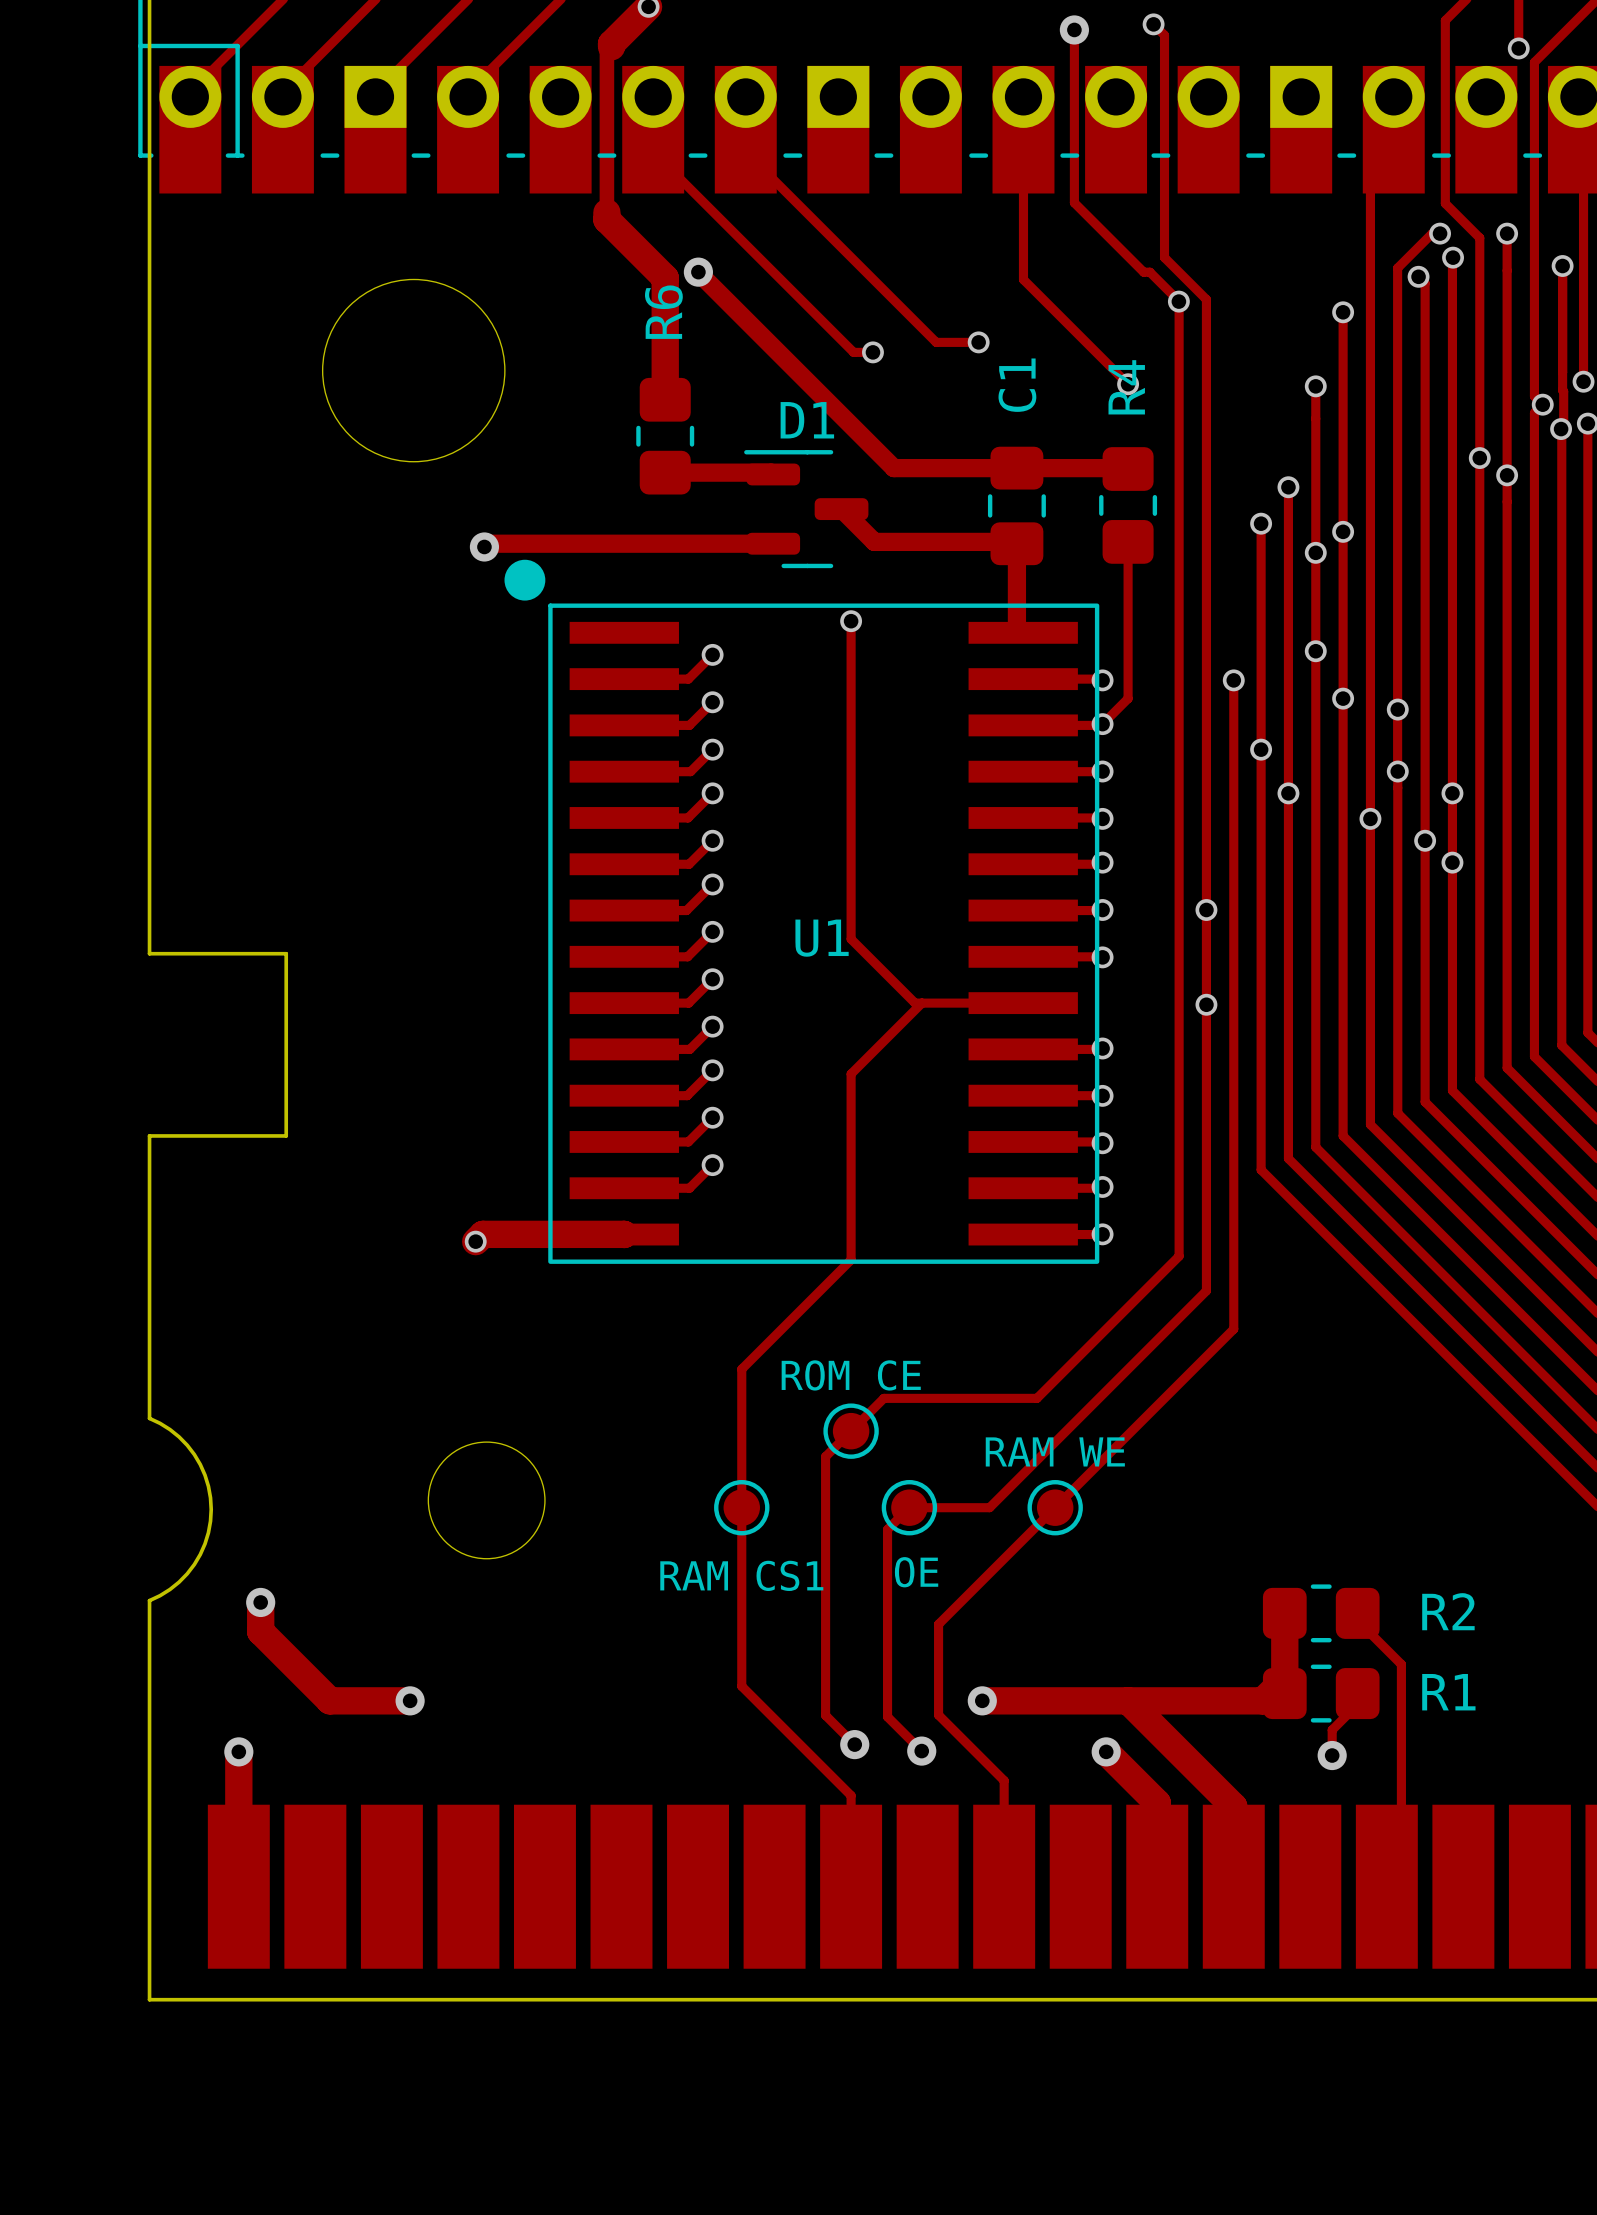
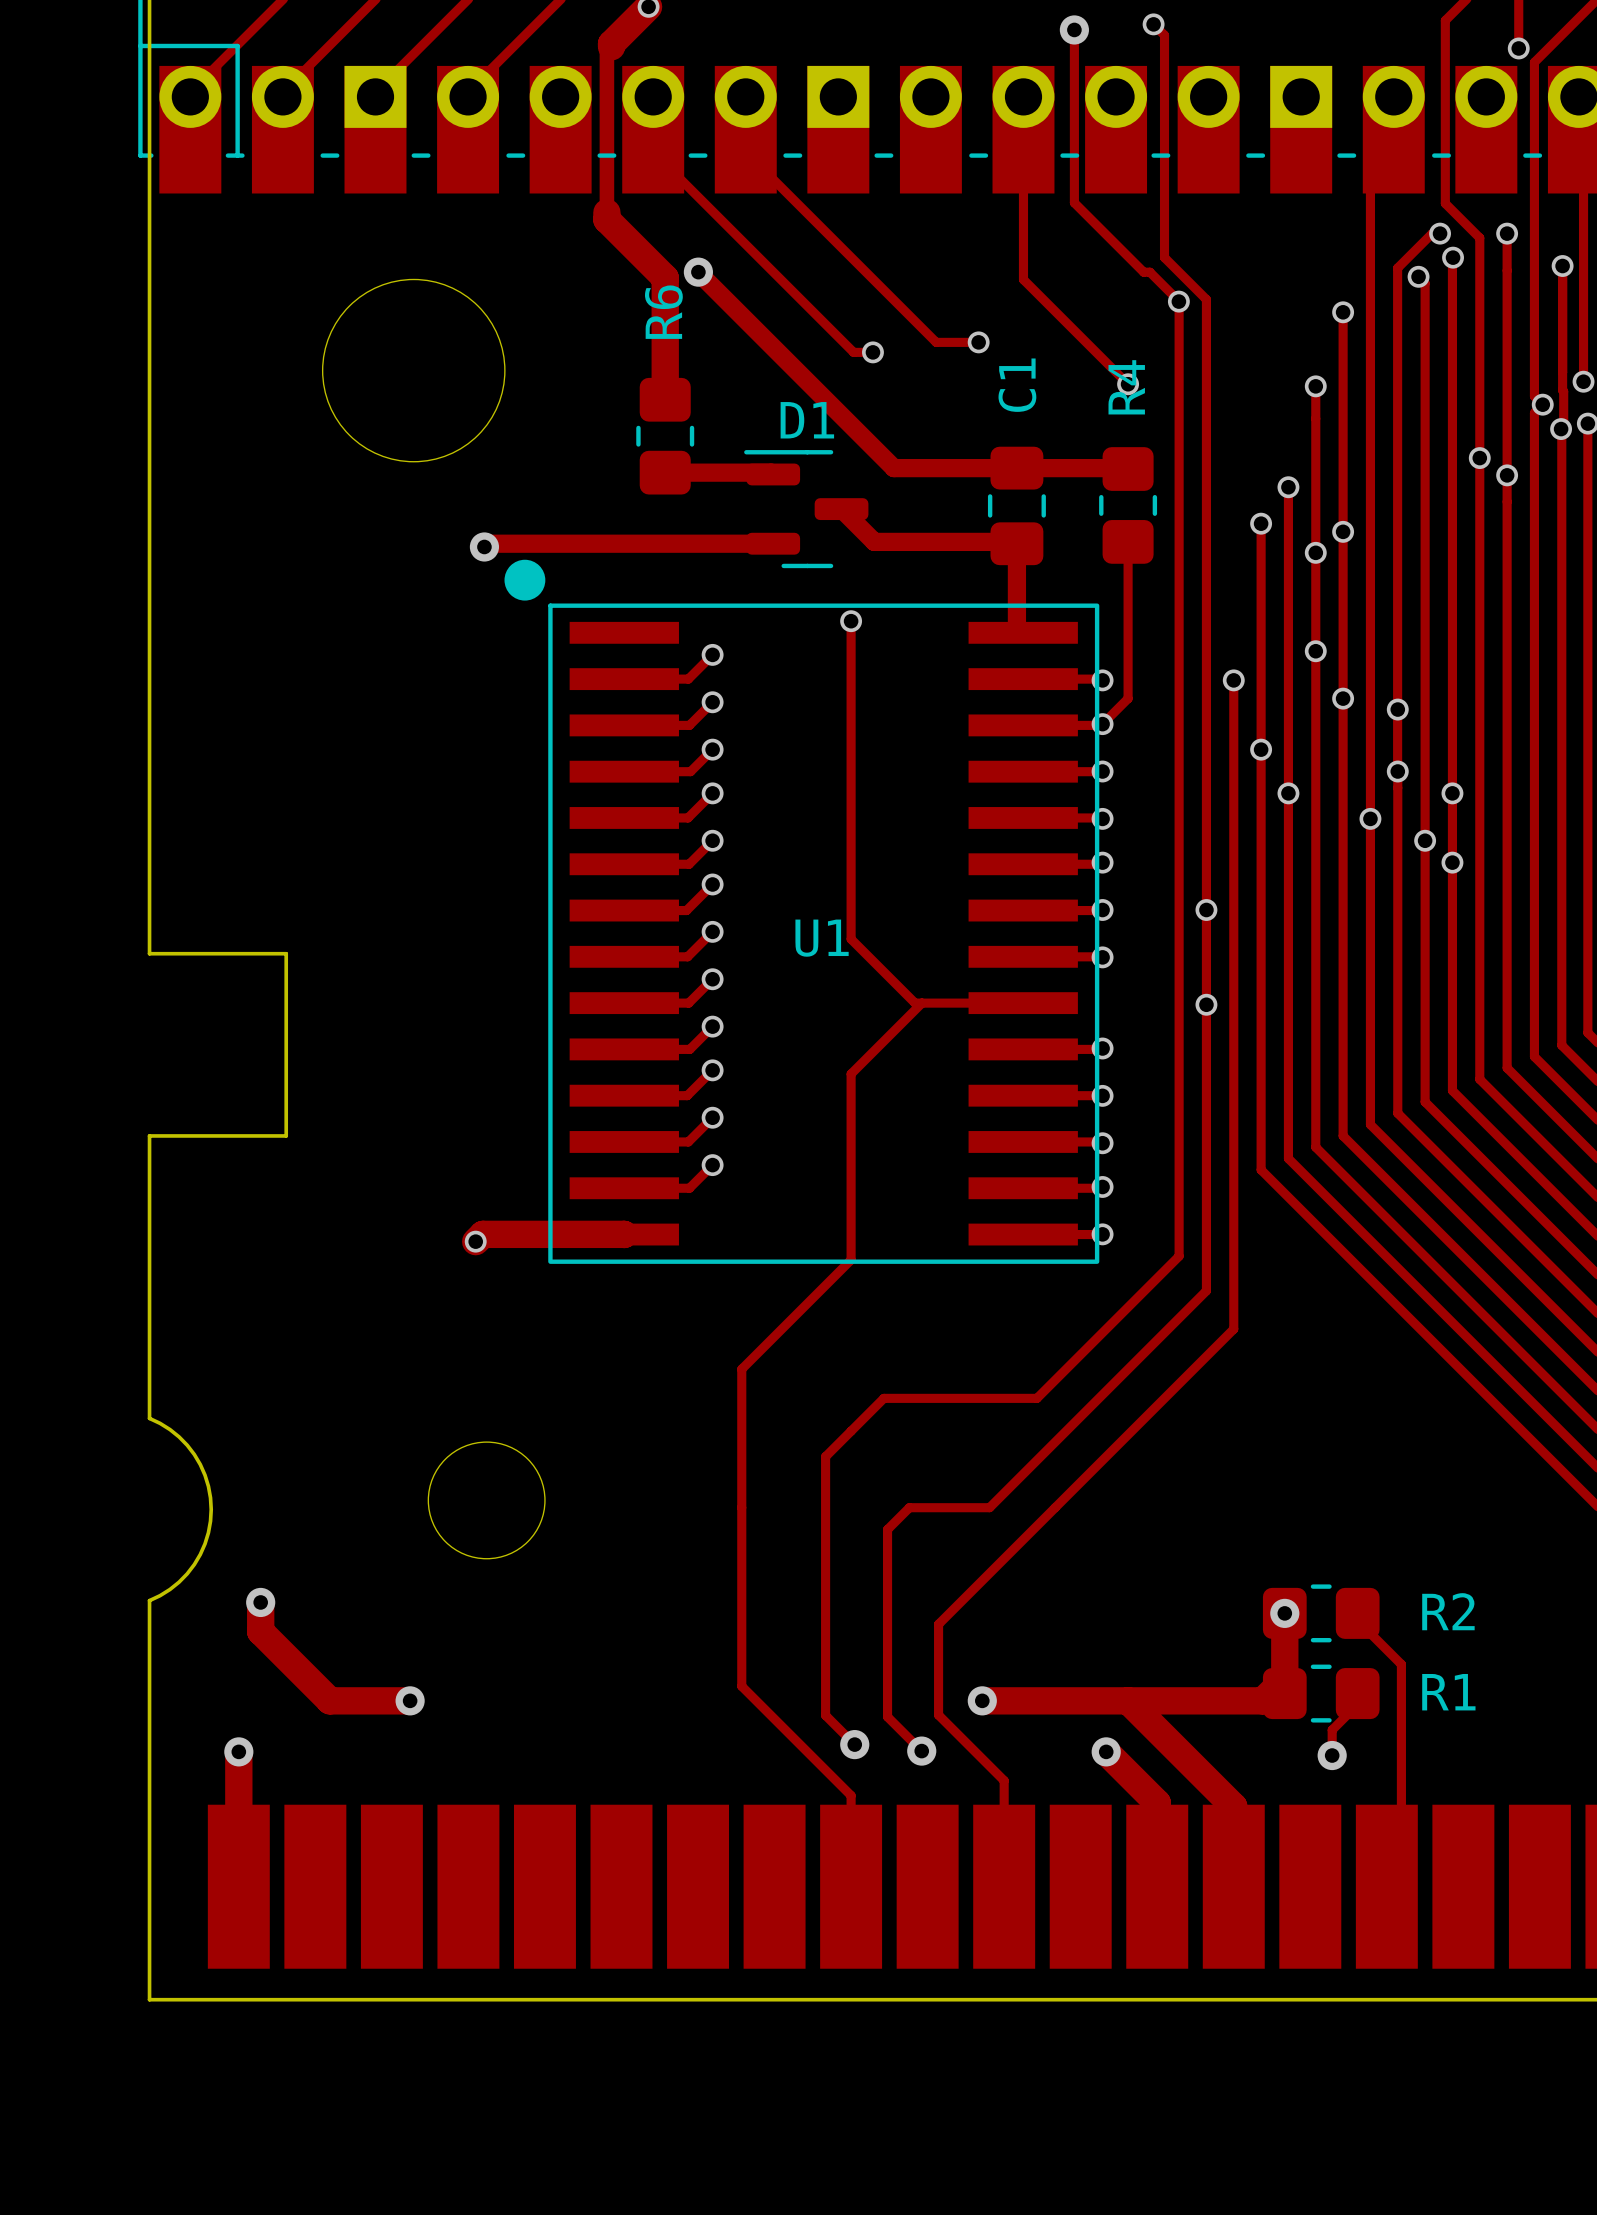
part: ROM CE (851, 1431) -> none
part: RAM CS1 (741, 1507) -> none
part: OE (909, 1507) -> none
part: RAM WE (1055, 1507) -> none
via: none -> (1284, 1613)

